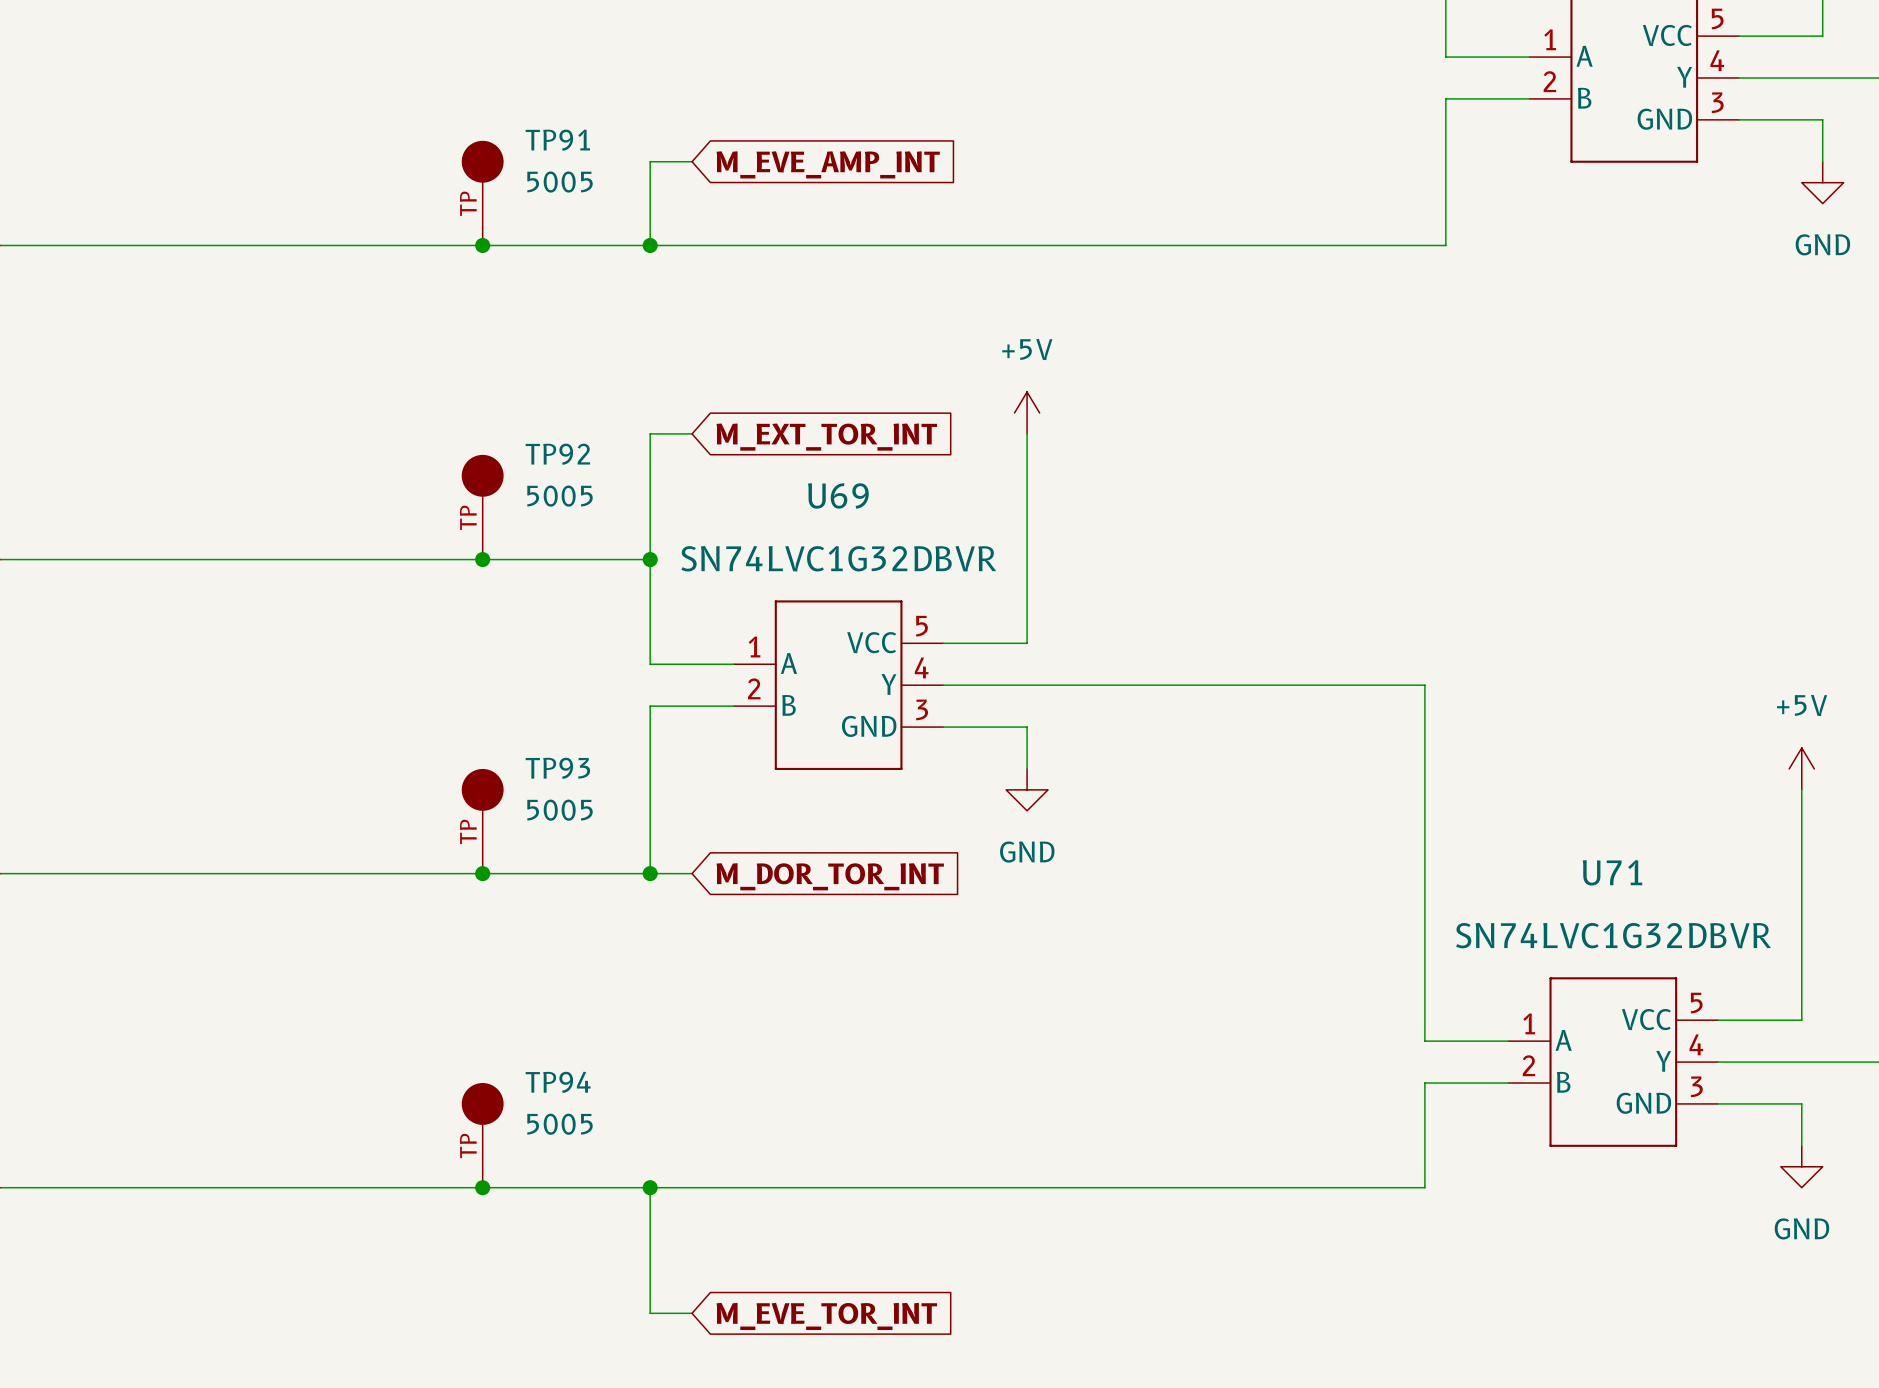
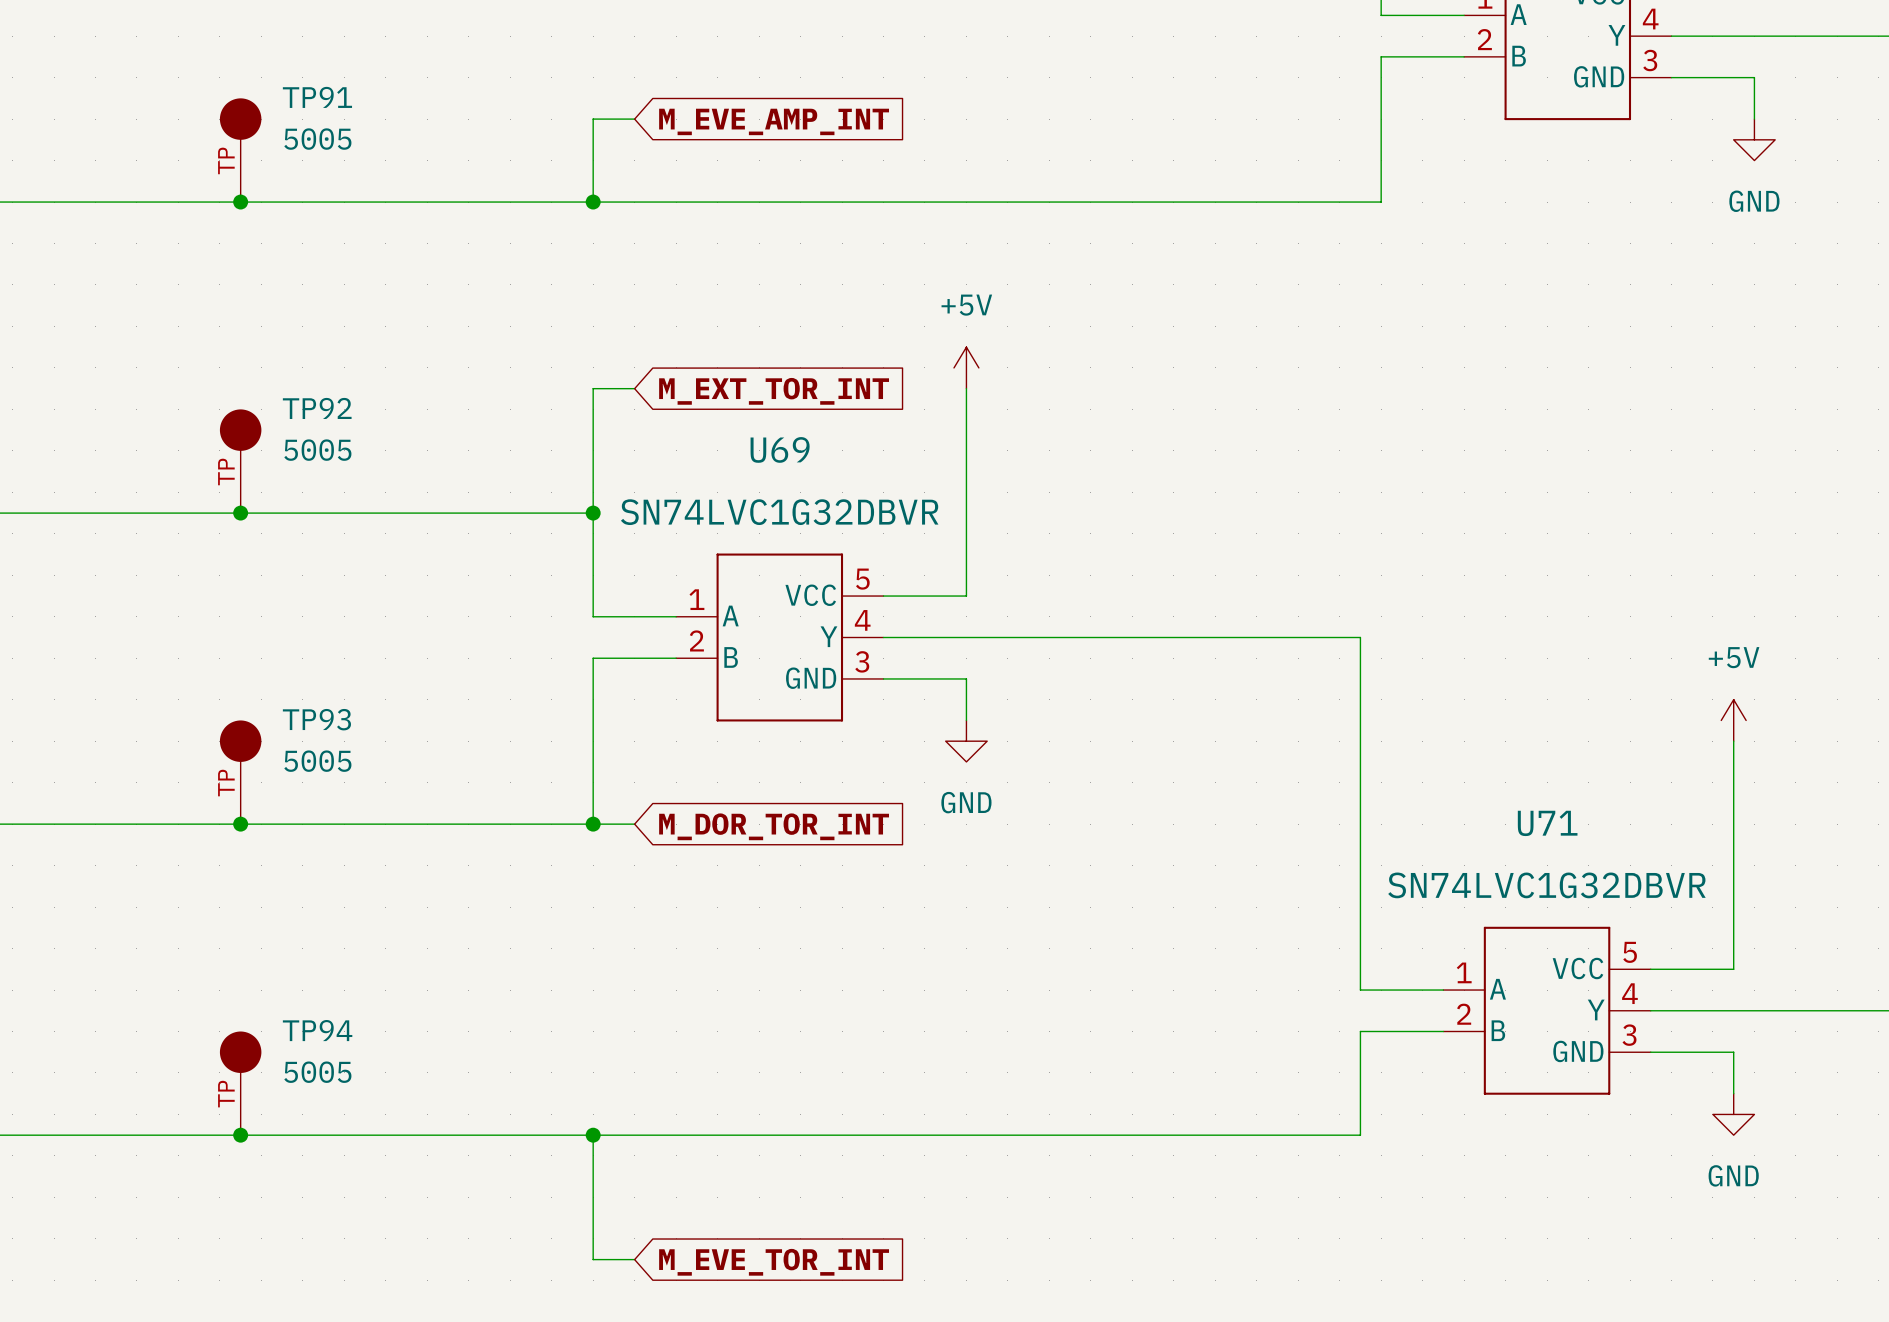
TP91 position: (482, 193) -> (240, 150)
junction: none -> (240, 202)
junction: (482, 245) -> none
TP92 position: (482, 507) -> (240, 461)
junction: none -> (240, 513)
junction: (482, 559) -> none
TP93 position: (482, 821) -> (240, 772)
junction: none -> (240, 824)
junction: (482, 873) -> none
TP94 position: (482, 1135) -> (240, 1083)
junction: none -> (240, 1135)
junction: (482, 1187) -> none

